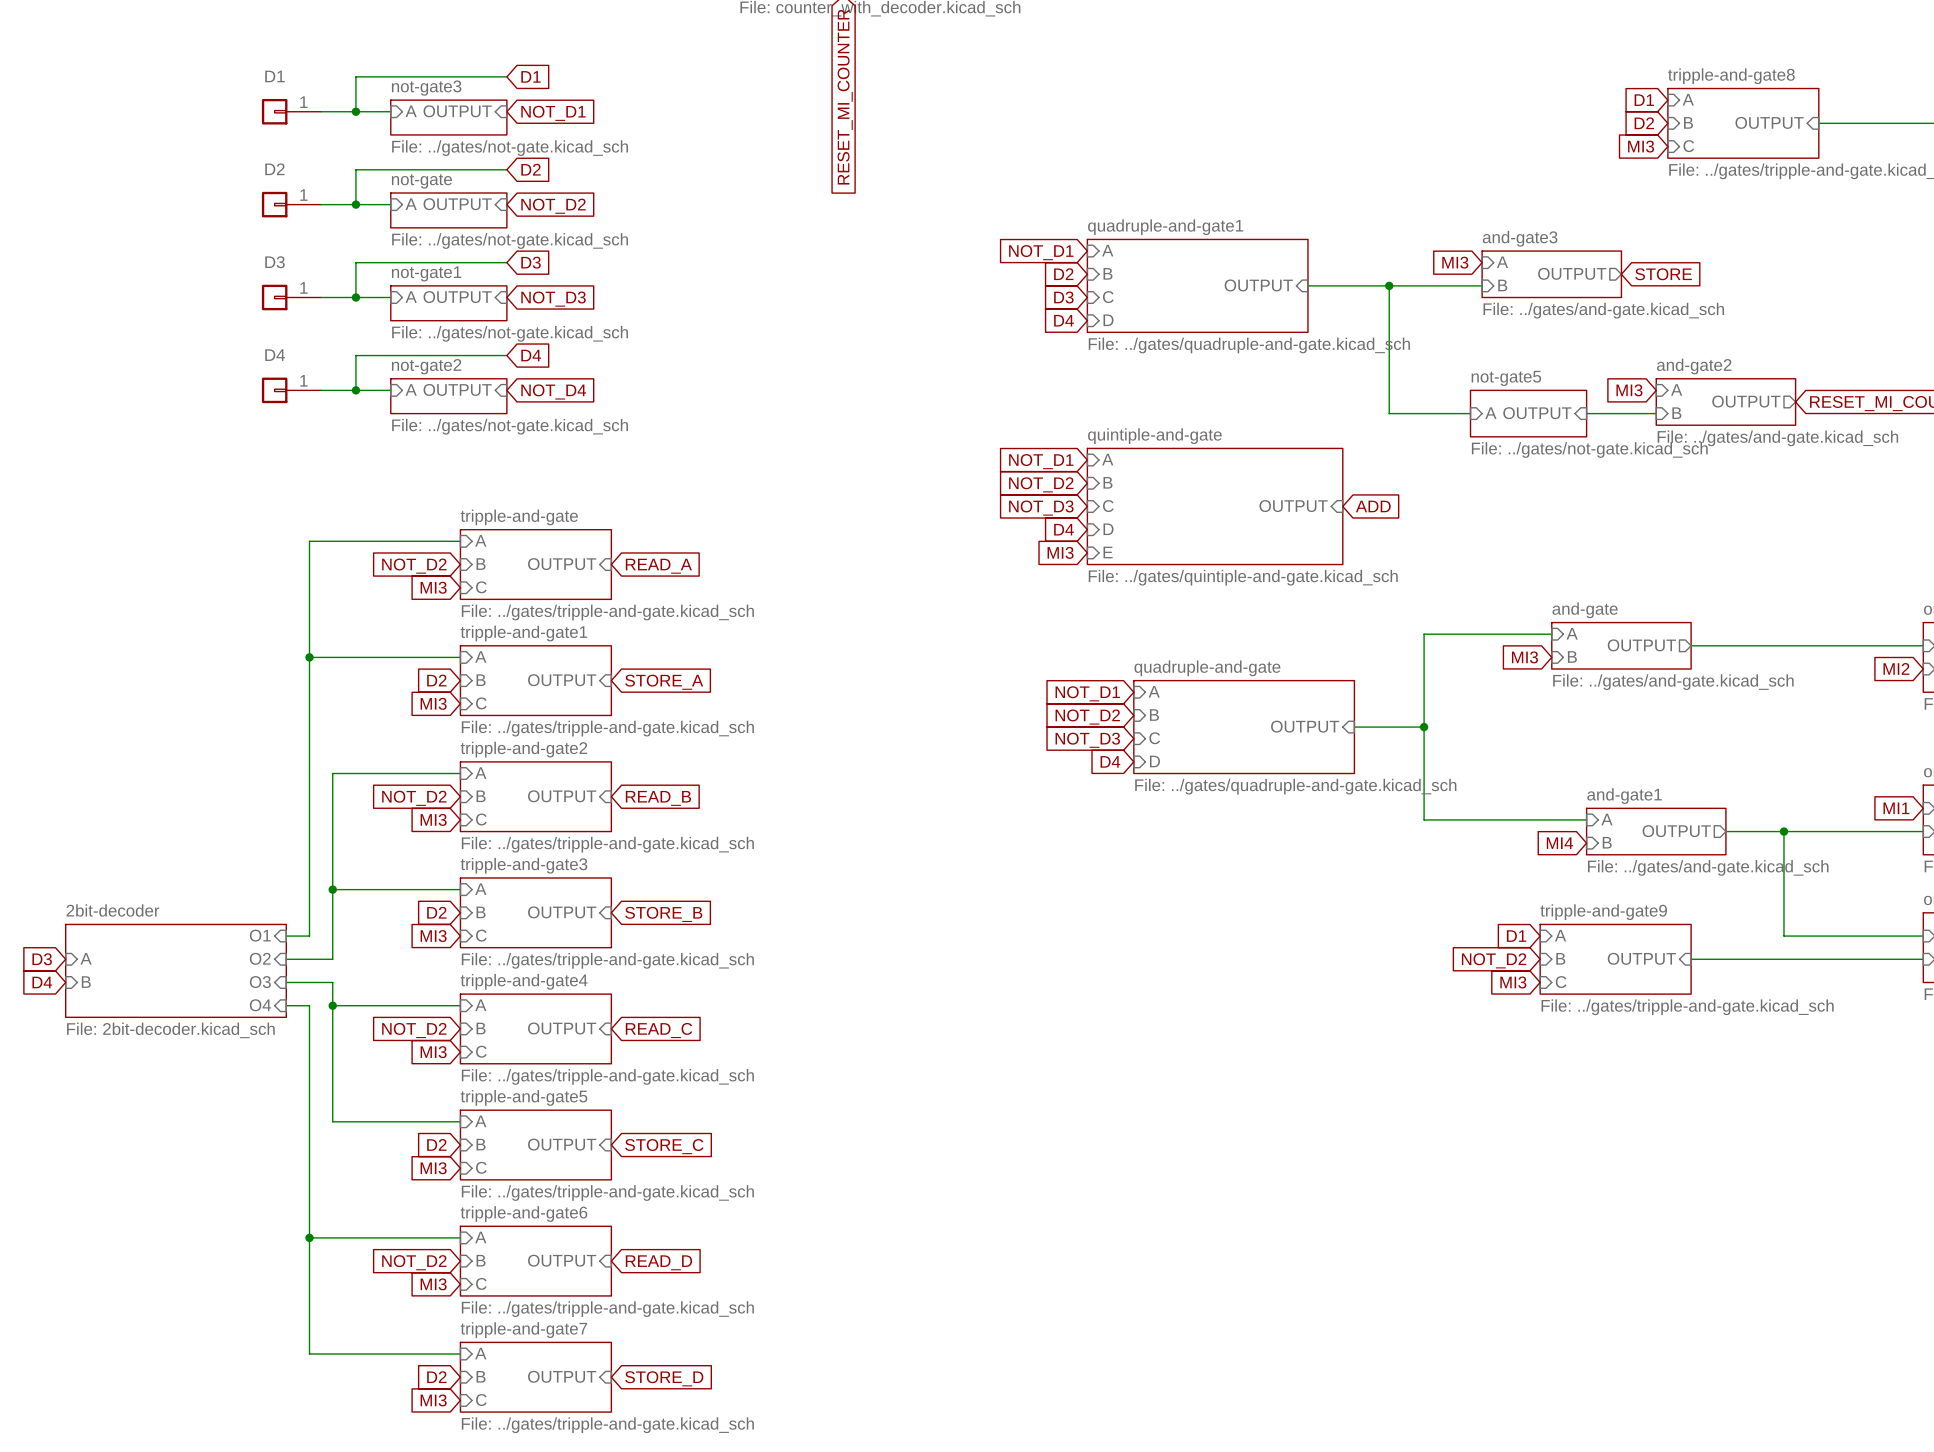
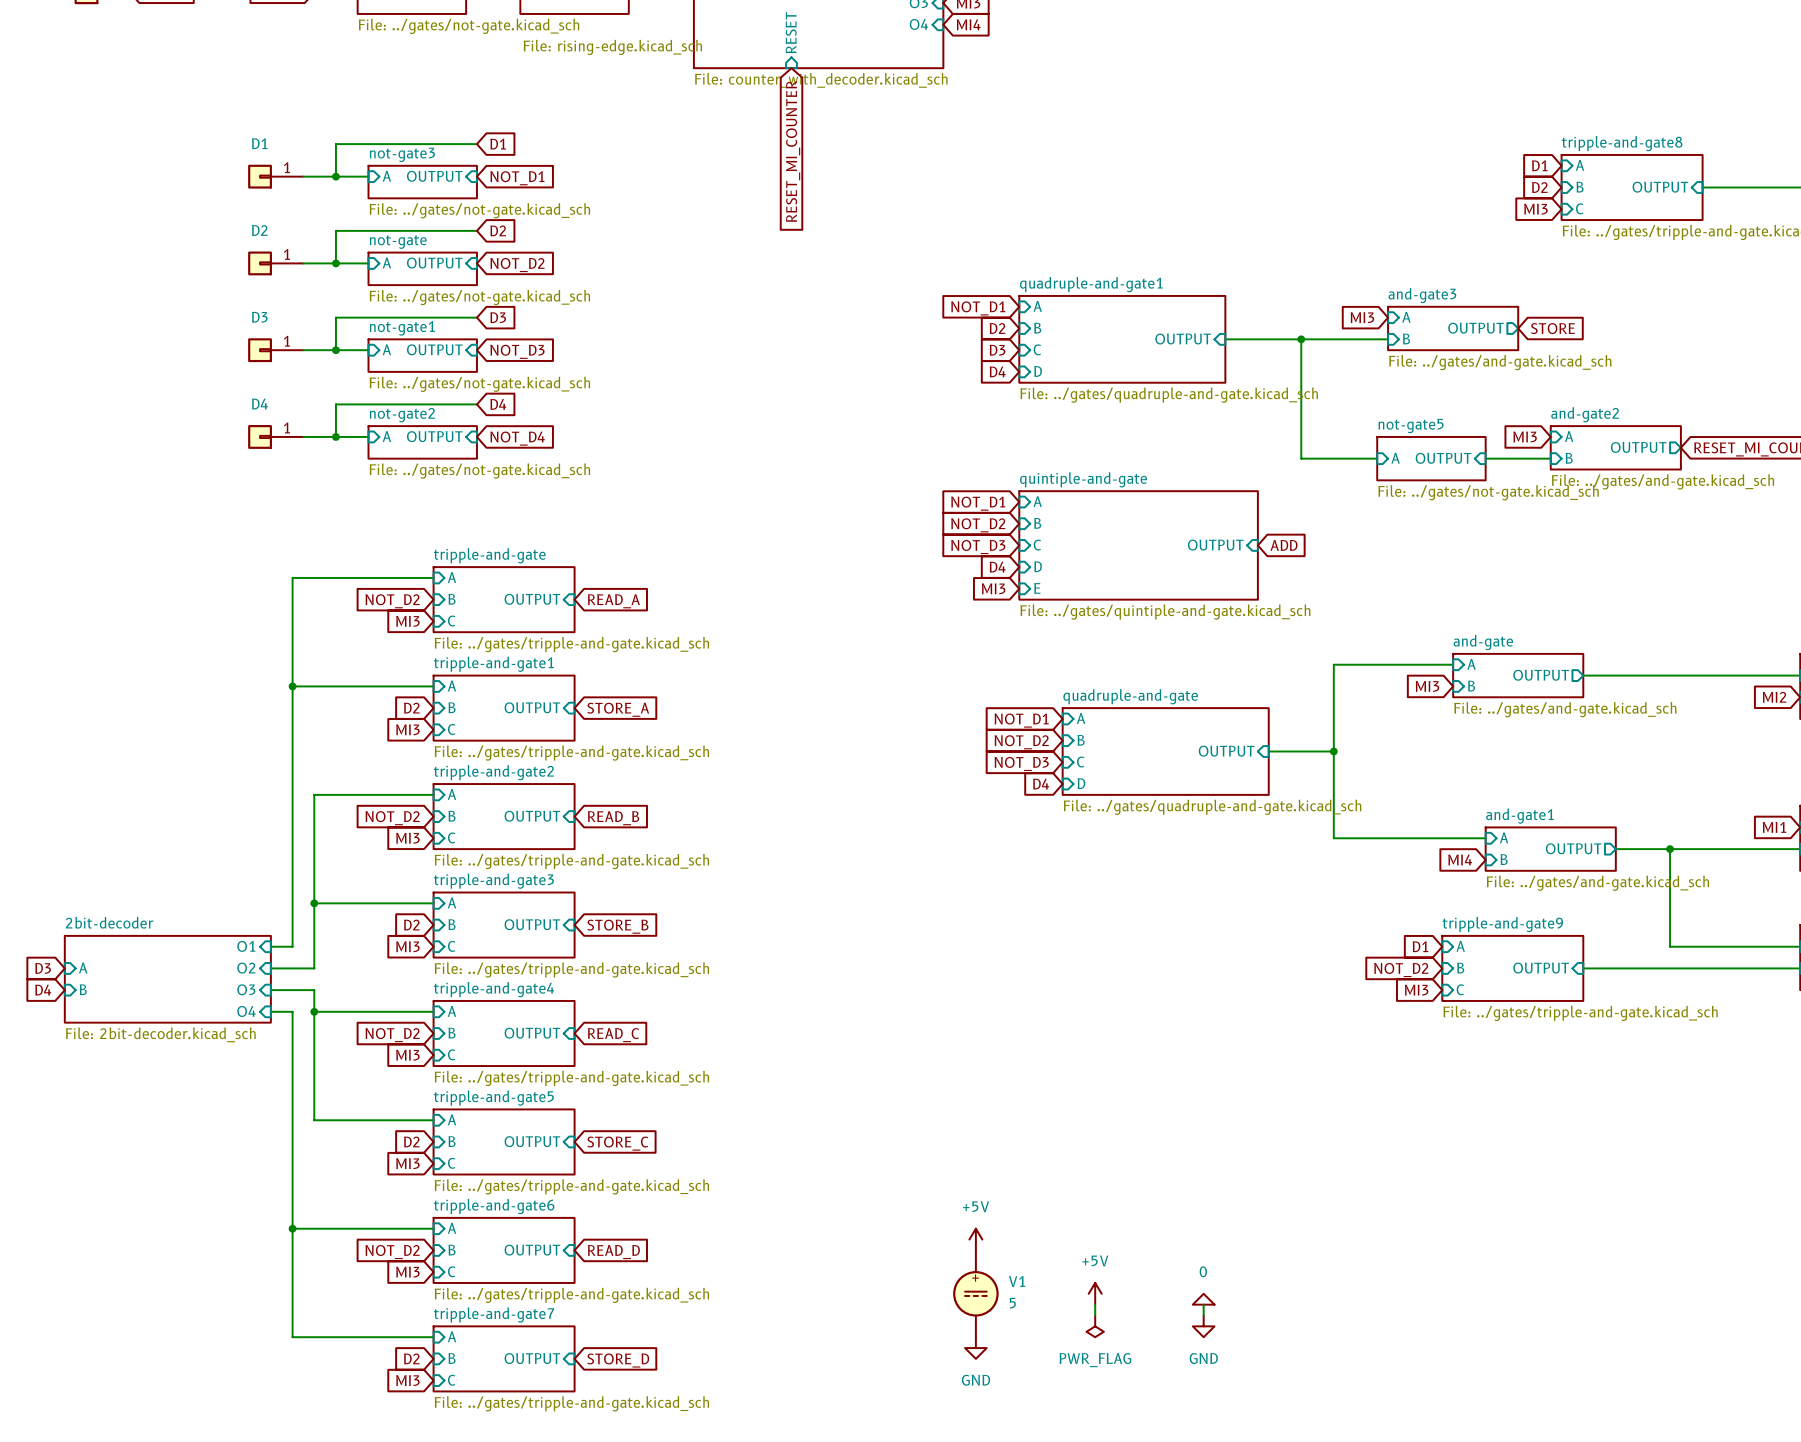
power symbol: none -> +5V (975, 1239)
V1: none -> 5 (975, 1293)
power symbol: none -> +5V (1095, 1293)
power symbol: none -> 0 (1203, 1299)
wire: none -> (1095, 1304) (1095, 1315)
wire: none -> (1203, 1304) (1203, 1315)
power symbol: none -> PWR_FLAG (1095, 1326)
power symbol: none -> GND (1203, 1326)
power symbol: none -> GND (975, 1348)

